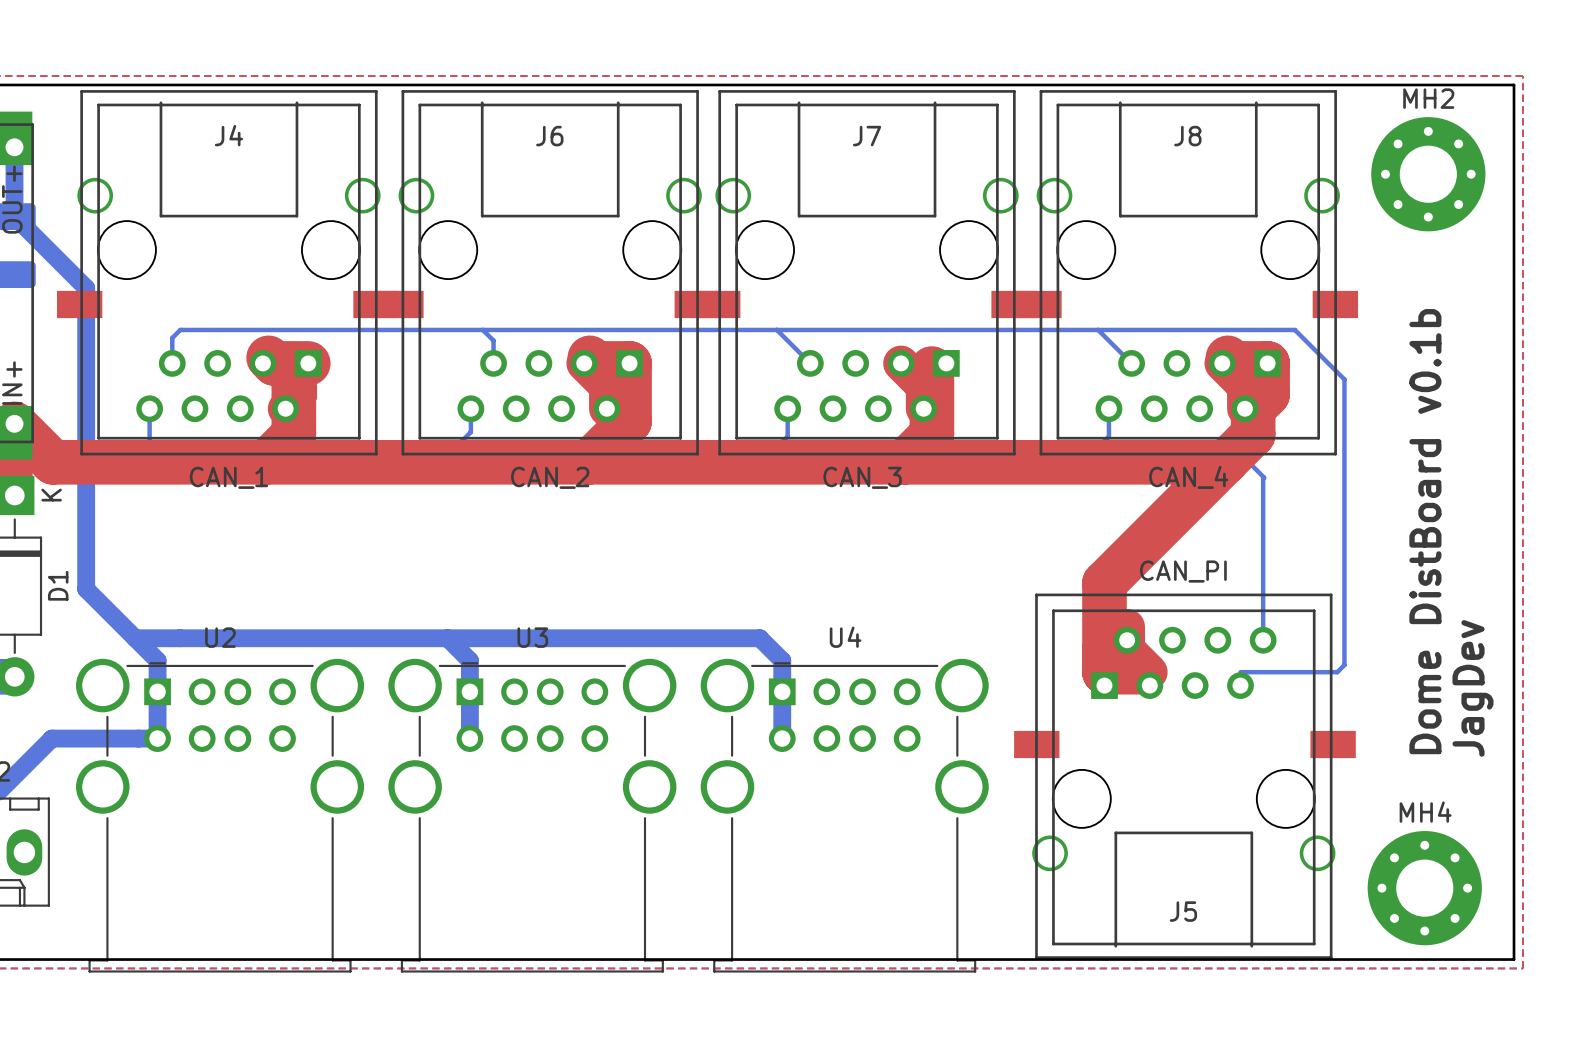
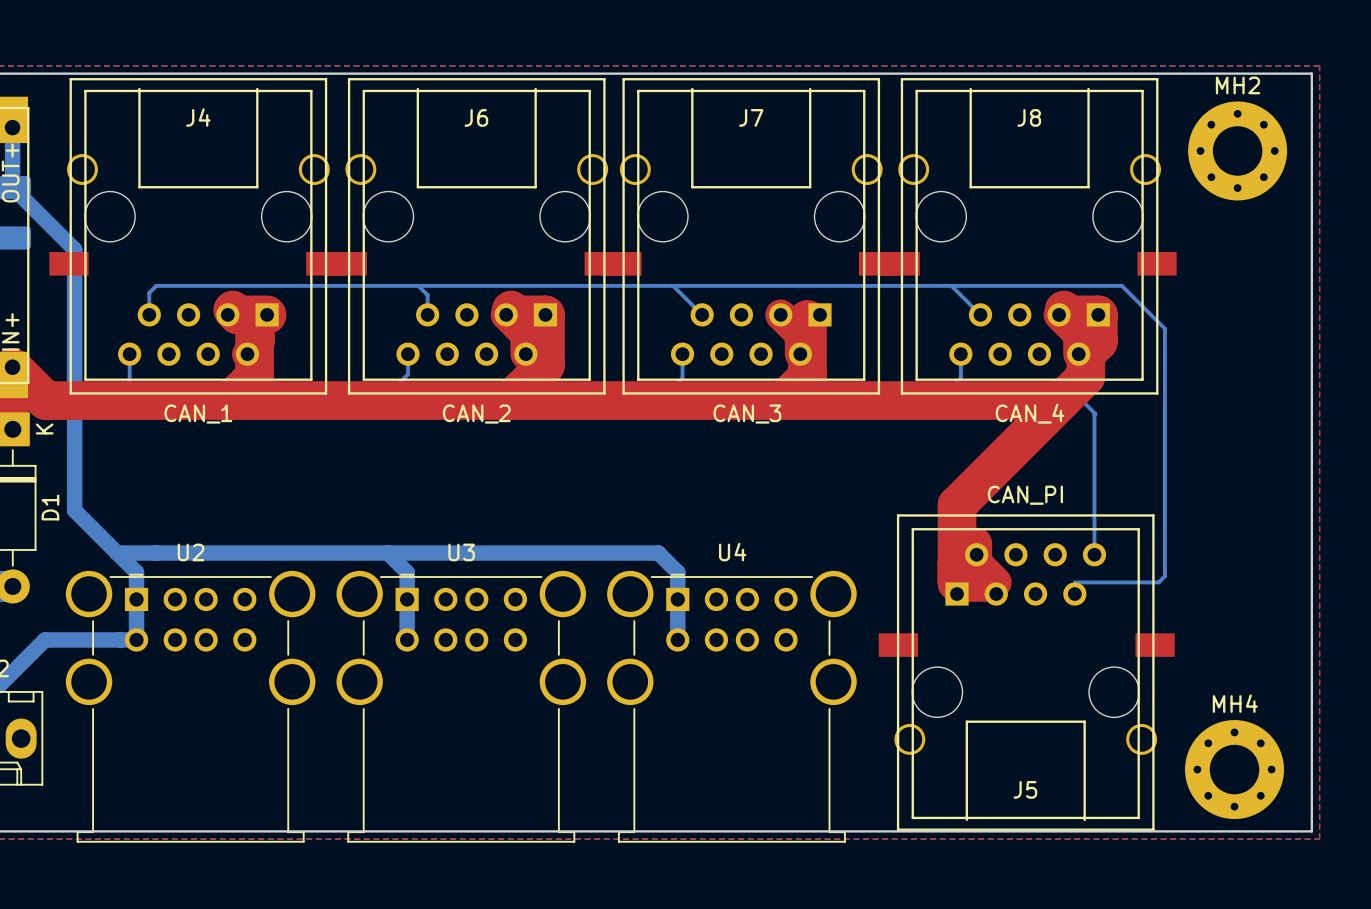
text: Dome DistBoard v0.1b (1425, 531) -> none
text: JagDev (1472, 688) -> none

